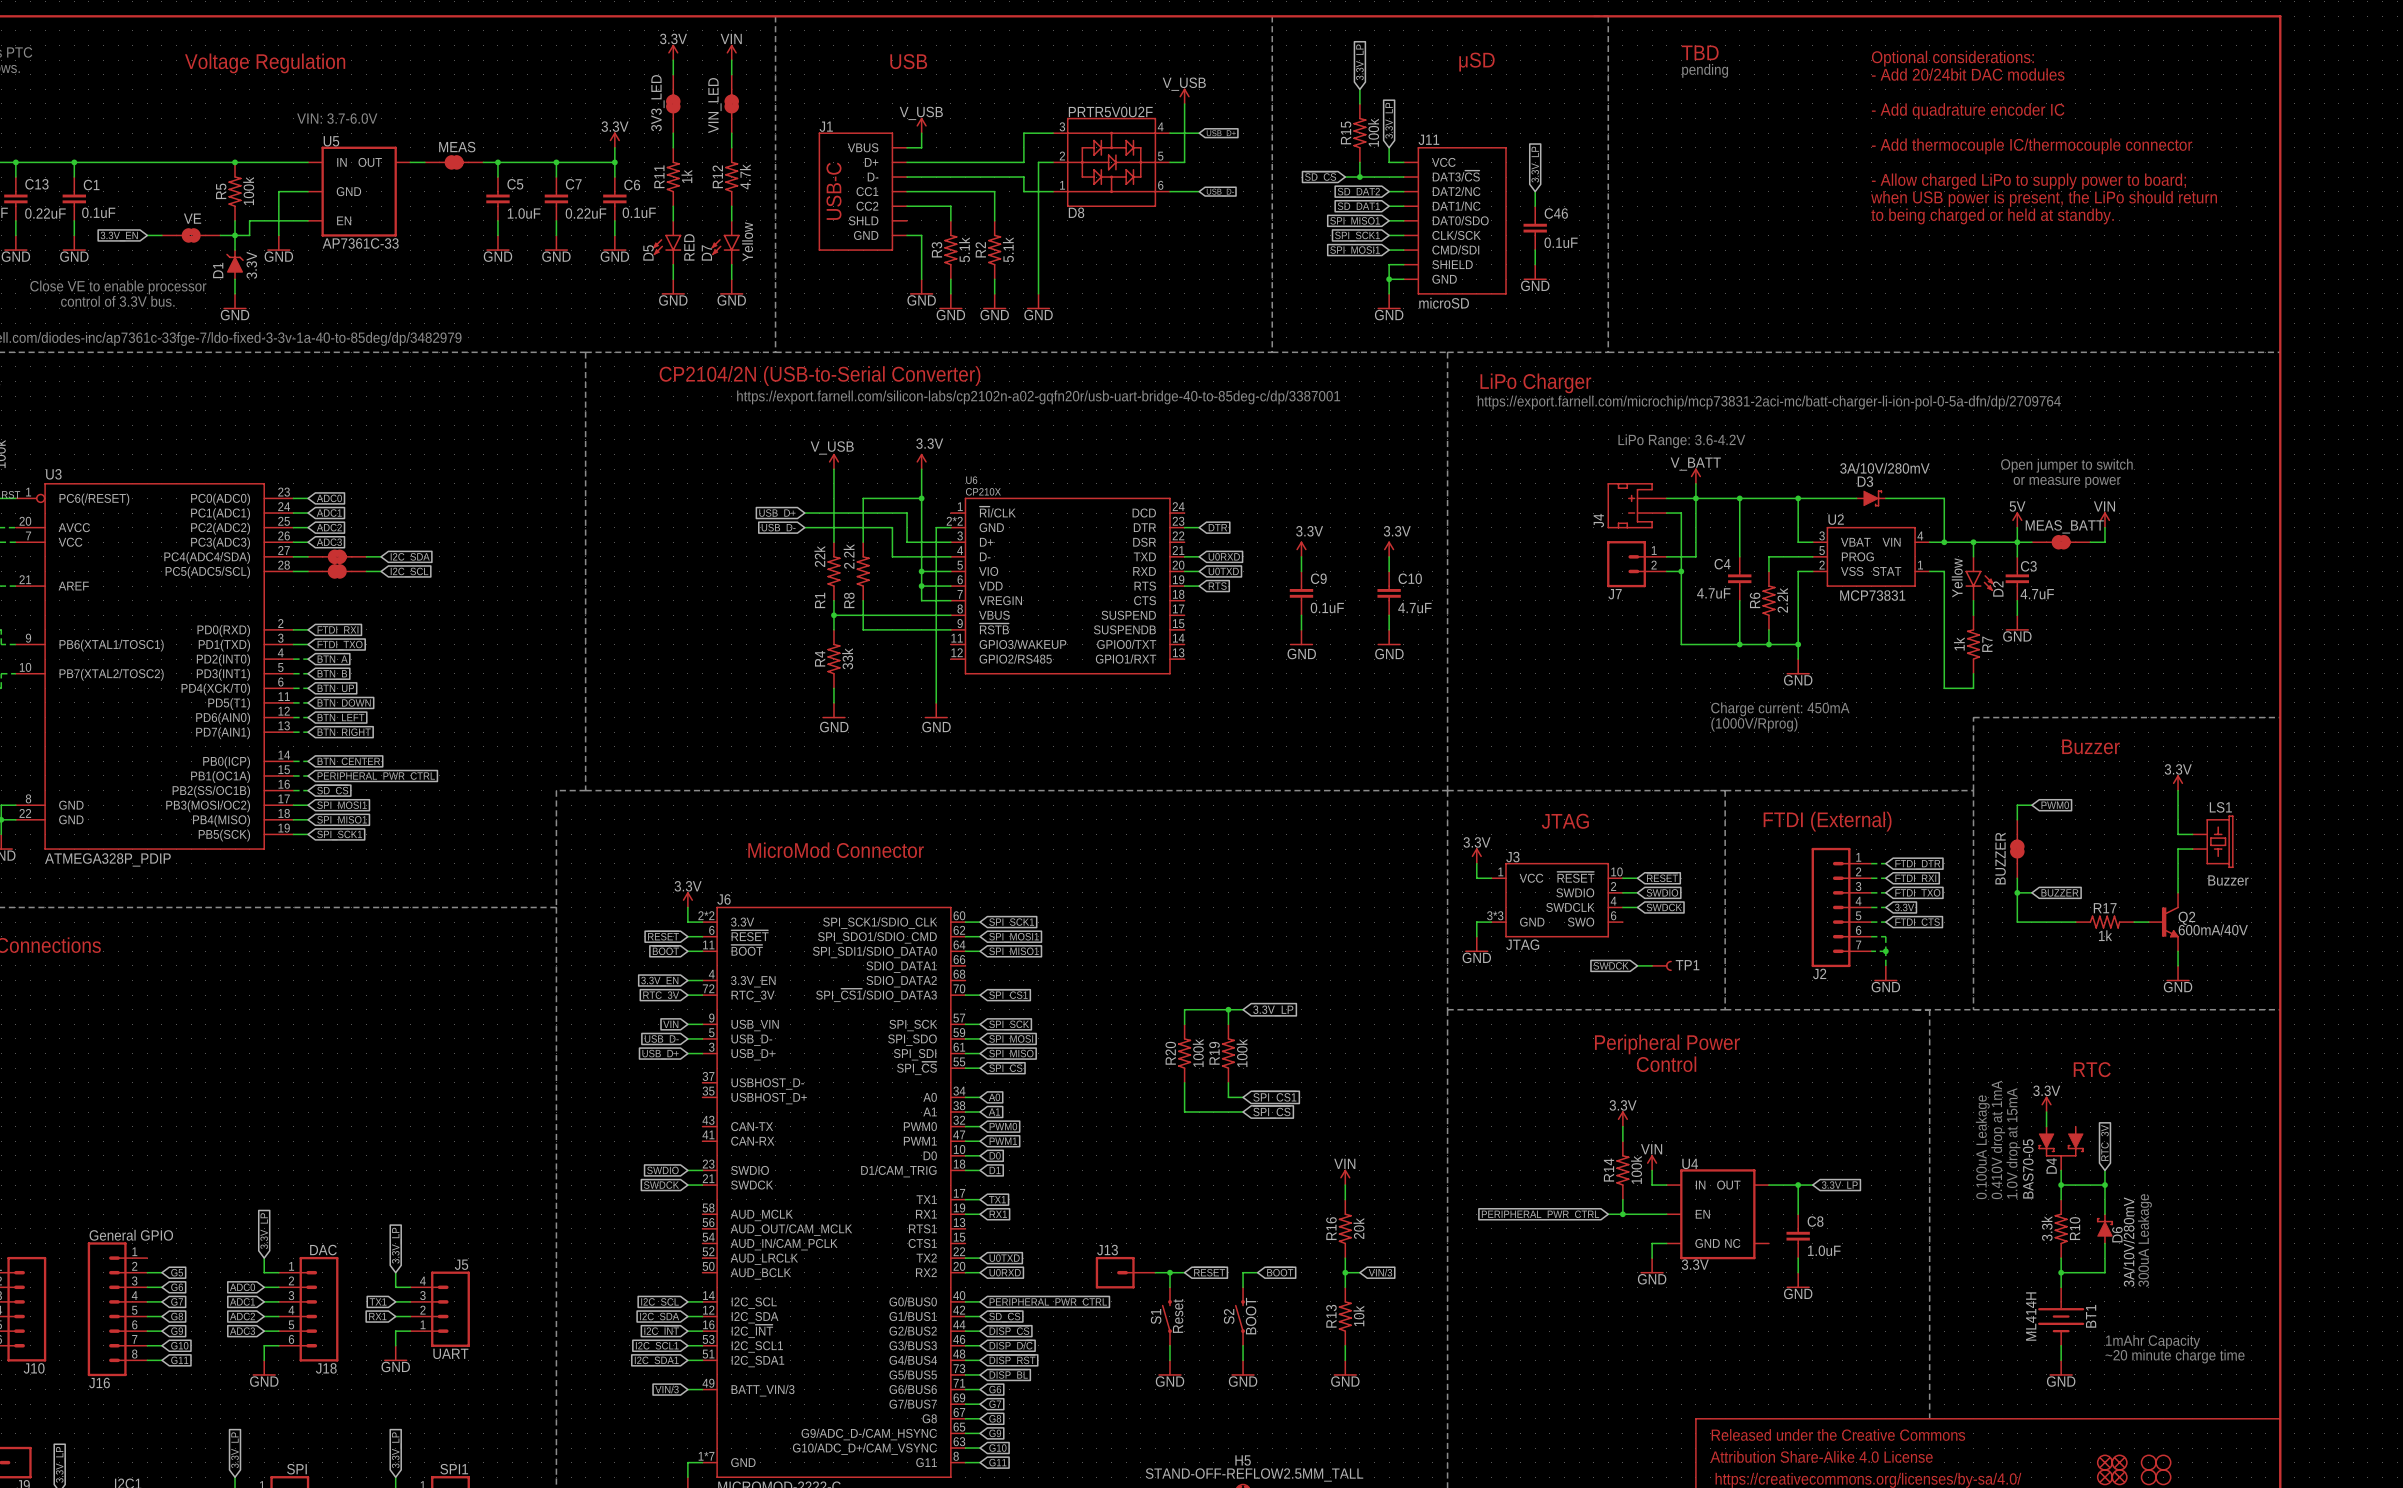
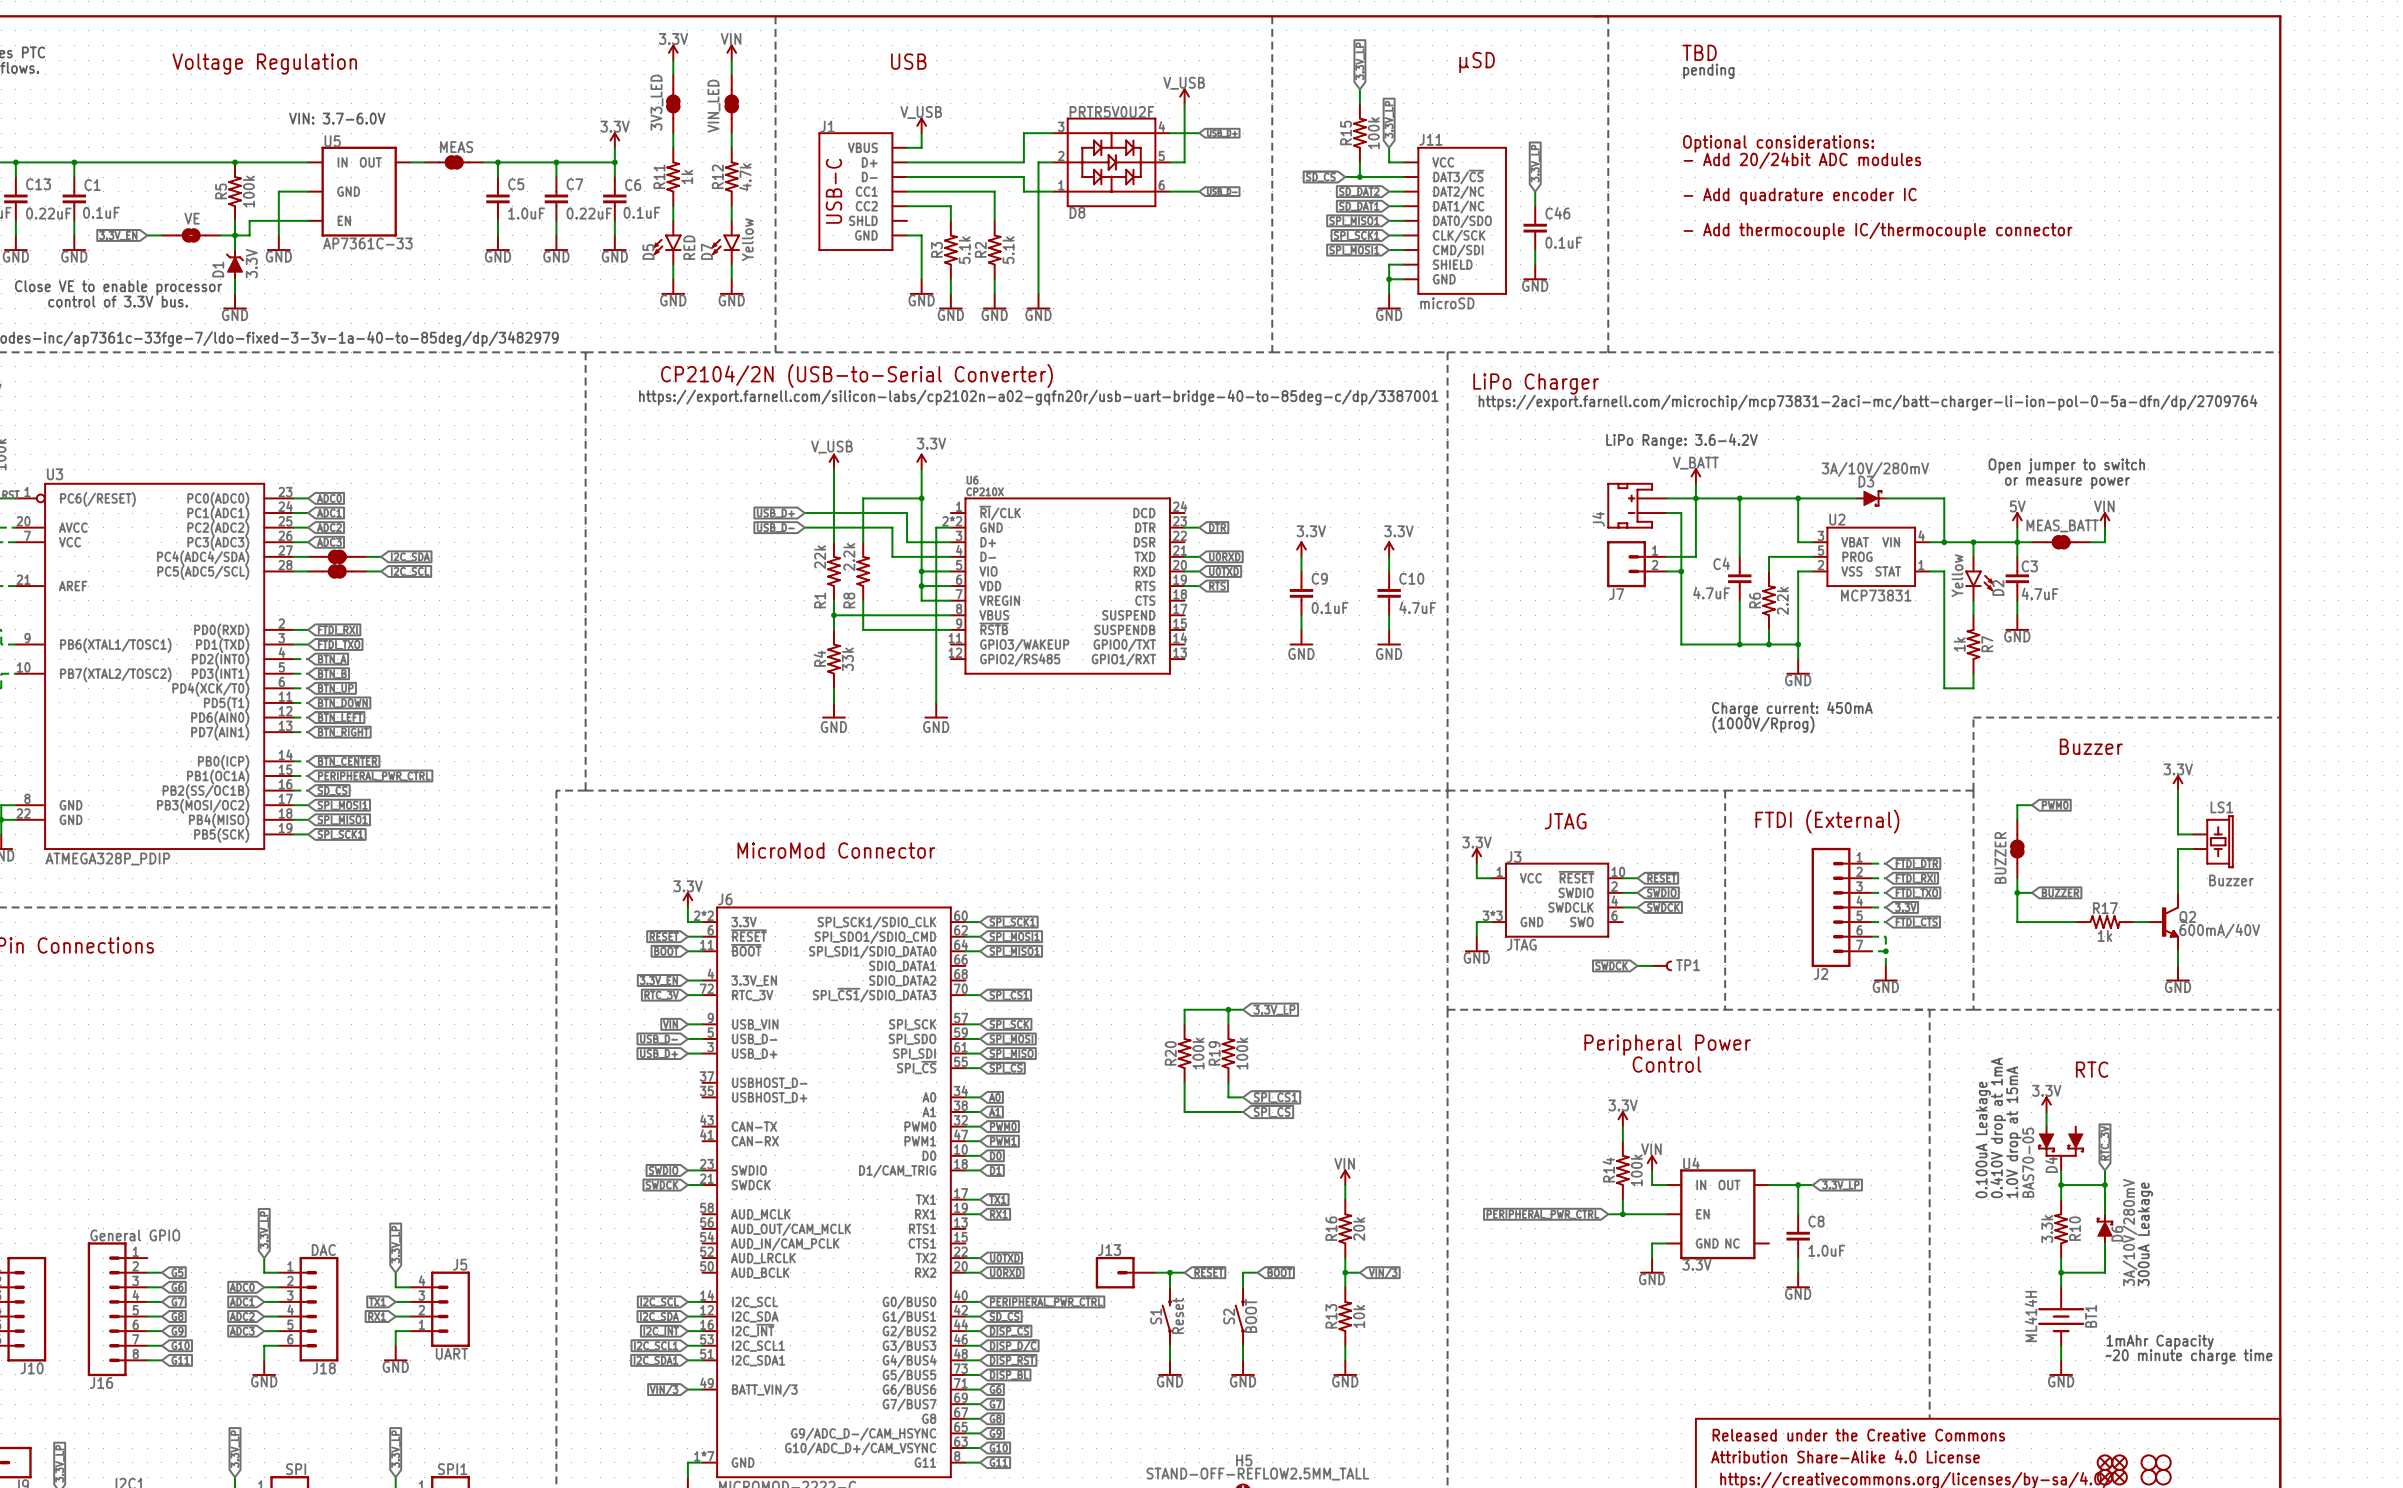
text: Optional considerations: (1952, 58) -> none
text: - Add 20/24bit DAC modules (1968, 74) -> none
text: - Add quadrature encoder IC (1968, 111) -> none
text: none -> Optional considerations: (1778, 143)
text: - Add thermocouple IC/thermocouple connector (2032, 146) -> none
text: none -> - Add 20/24bit ADC modules (1802, 160)
text: - Allow charged LiPo to supply power to board; (2028, 181) -> none
text: none -> - Add quadrature encoder IC (1800, 196)
text: when USB power is present, the LiPo should return (2044, 198) -> none
text: to being charged or held at standby. (1992, 216) -> none
text: none -> - Add thermocouple IC/thermocouple connector (1878, 231)

